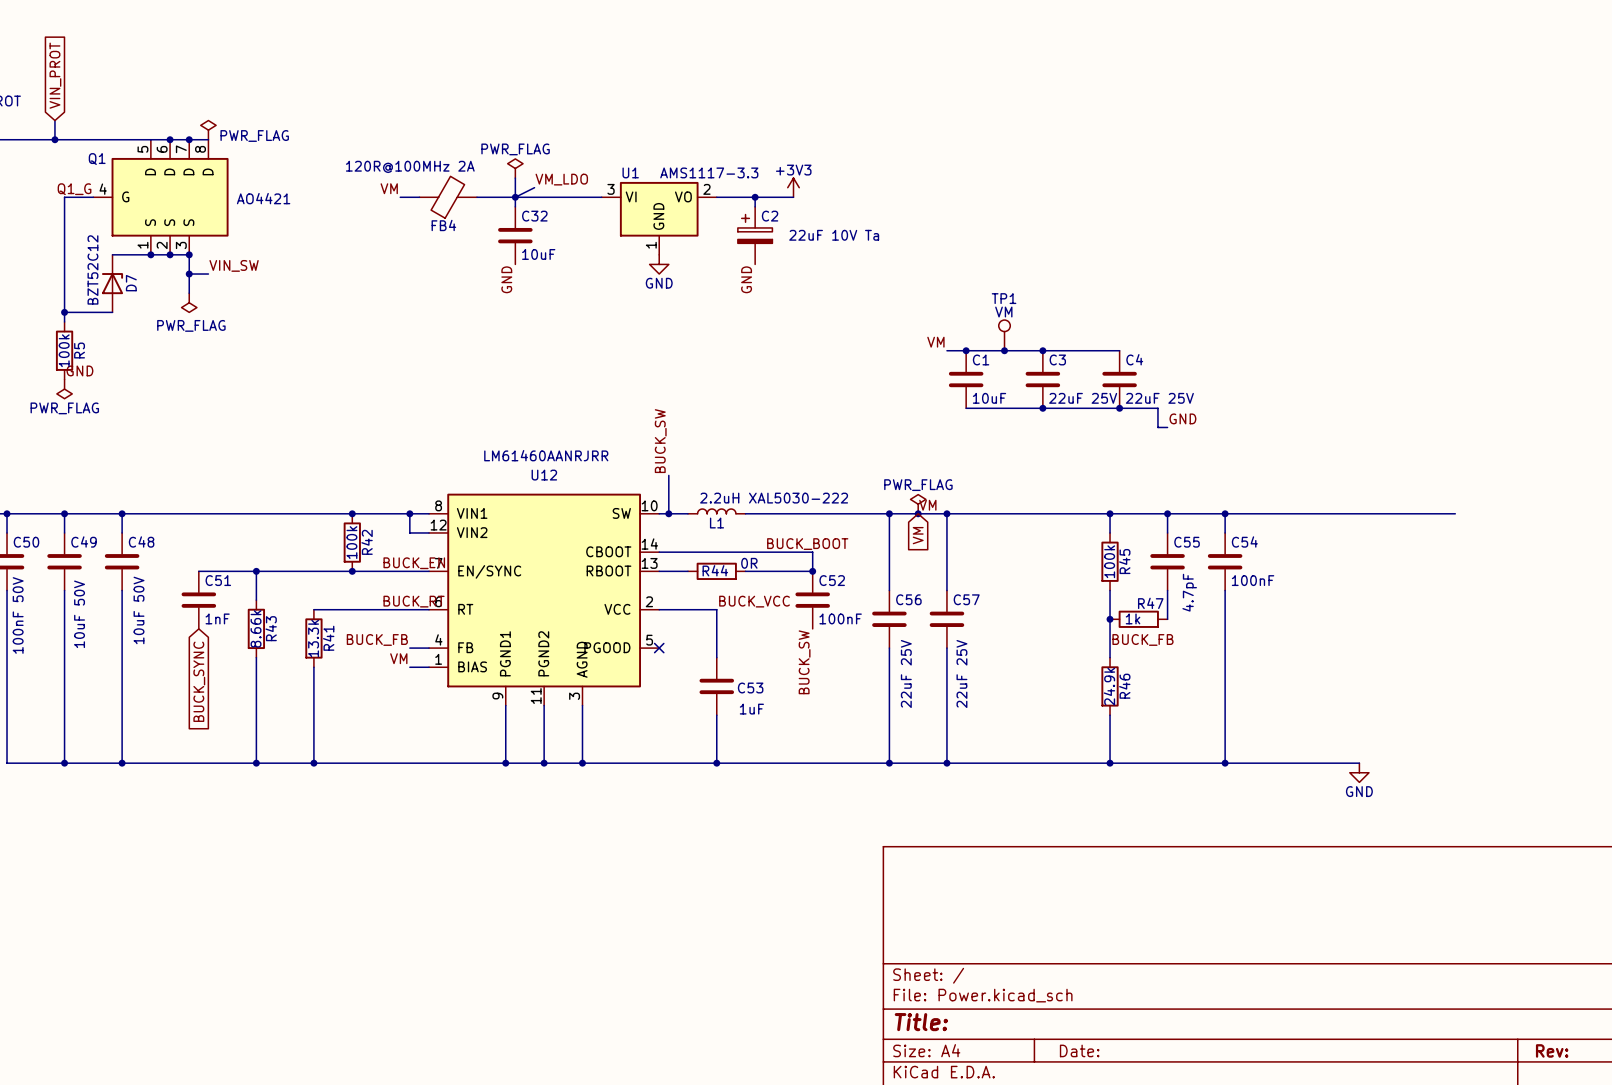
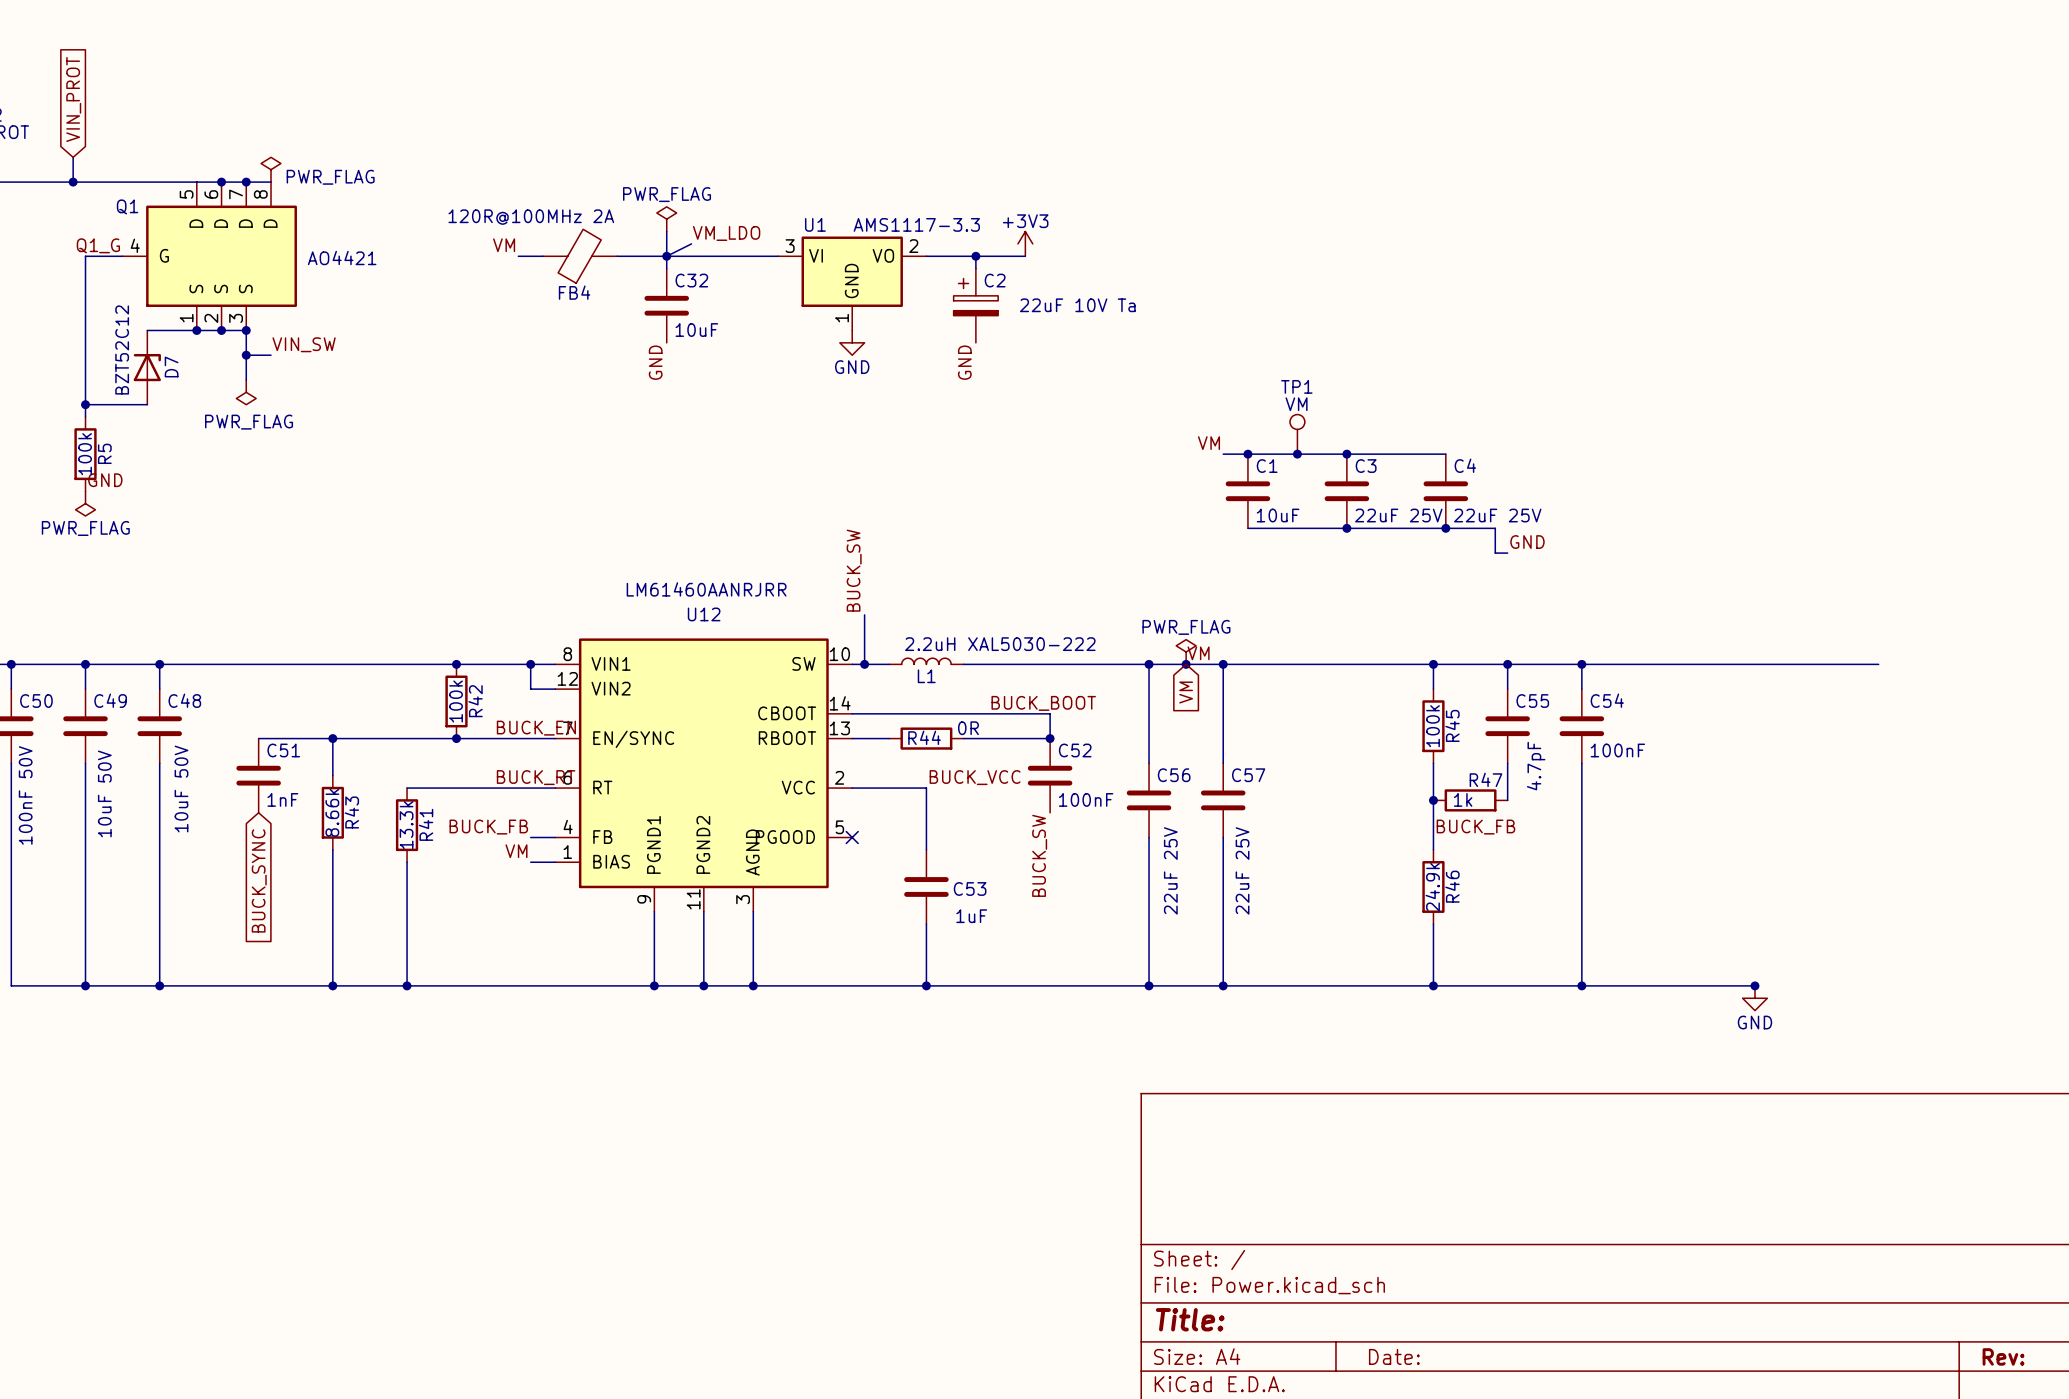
junction: none -> (1754, 985)

